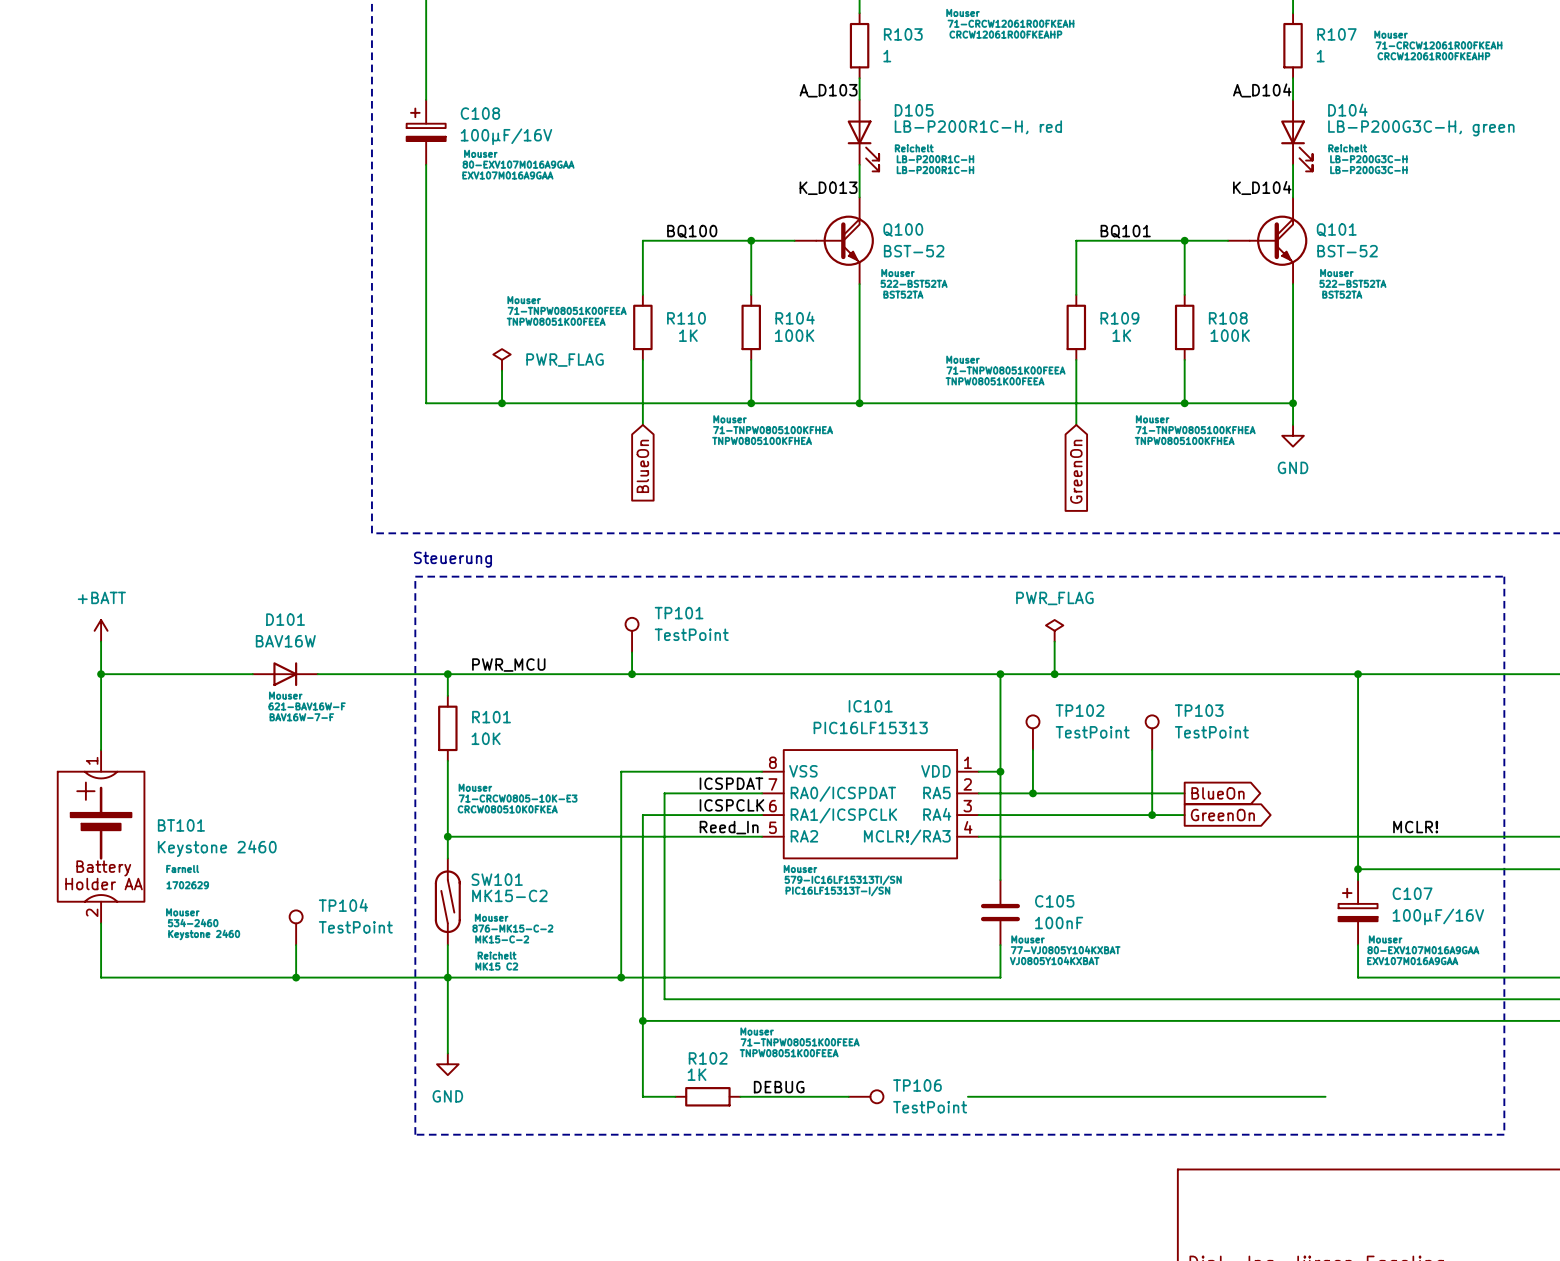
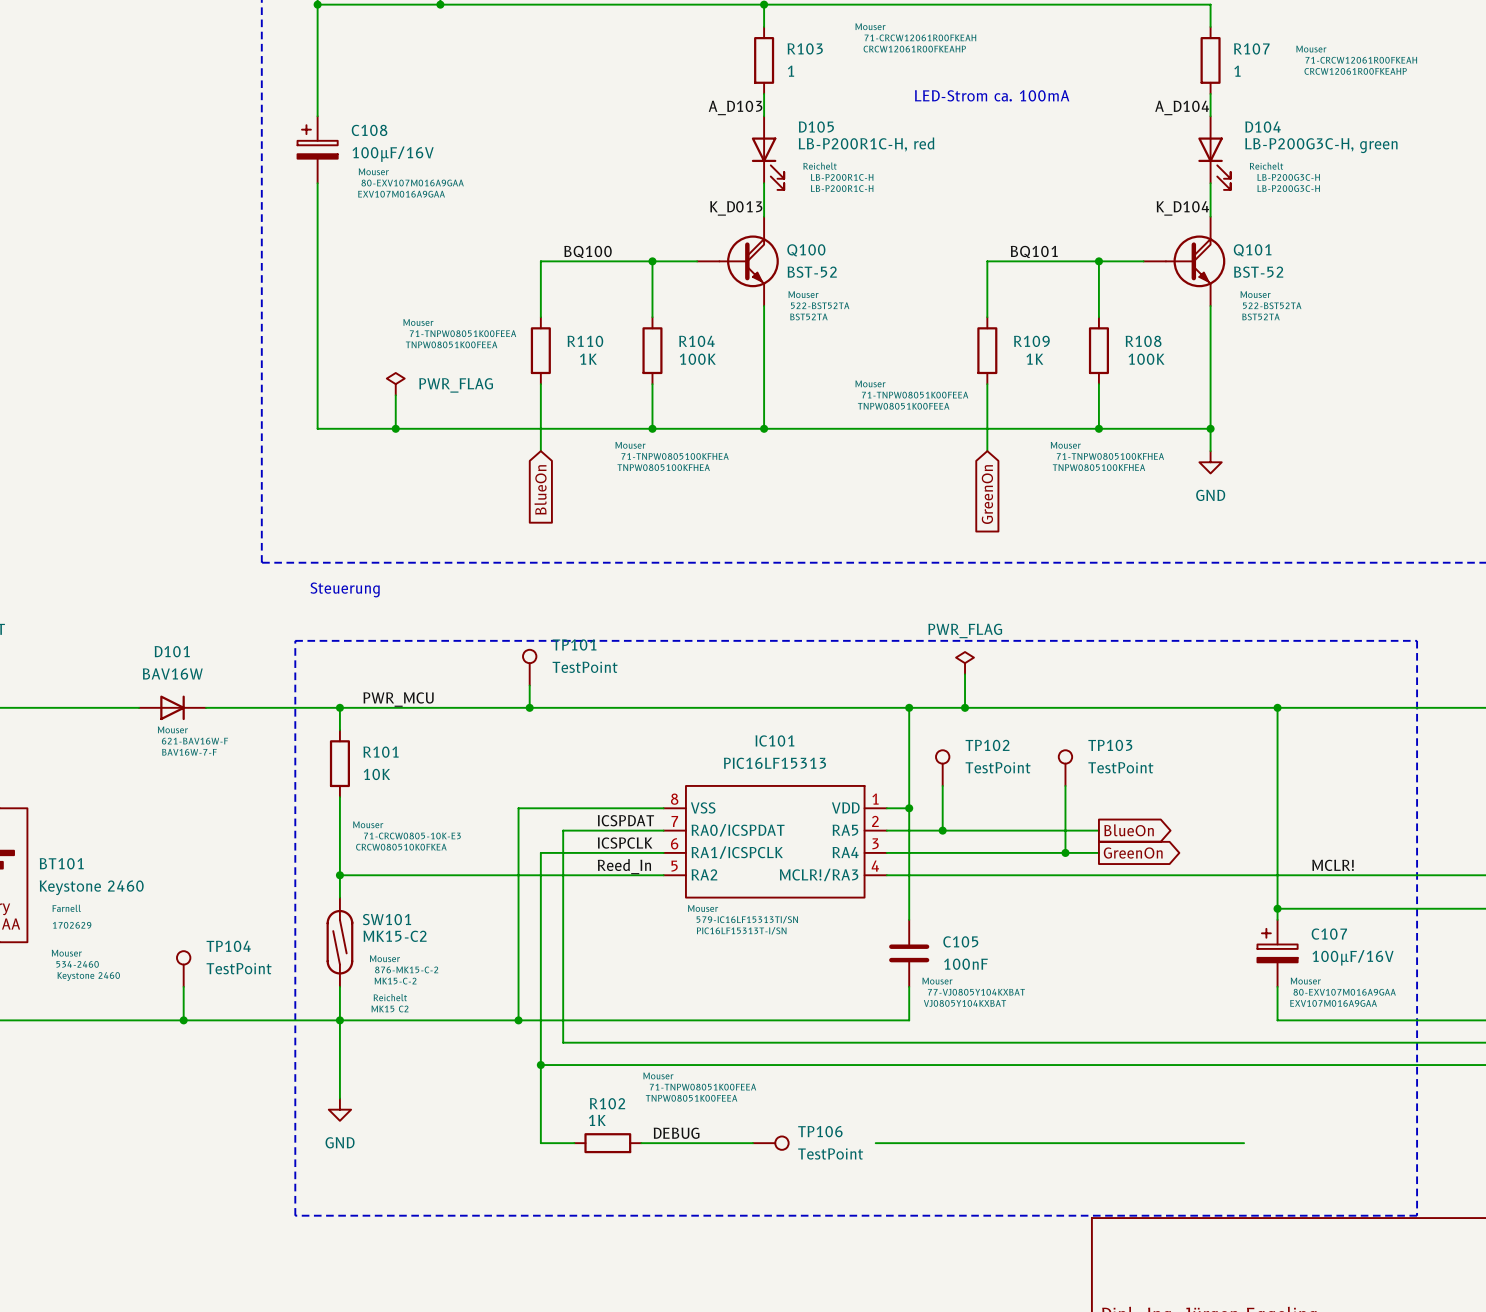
text: none -> LED-Strom ca. 100mA (992, 95)
line: (415, 576) (1504, 576) (1504, 1134) (415, 1134) (415, 576) -> (295, 640) (295, 1215) (1417, 1215) (1417, 640) (295, 640)

